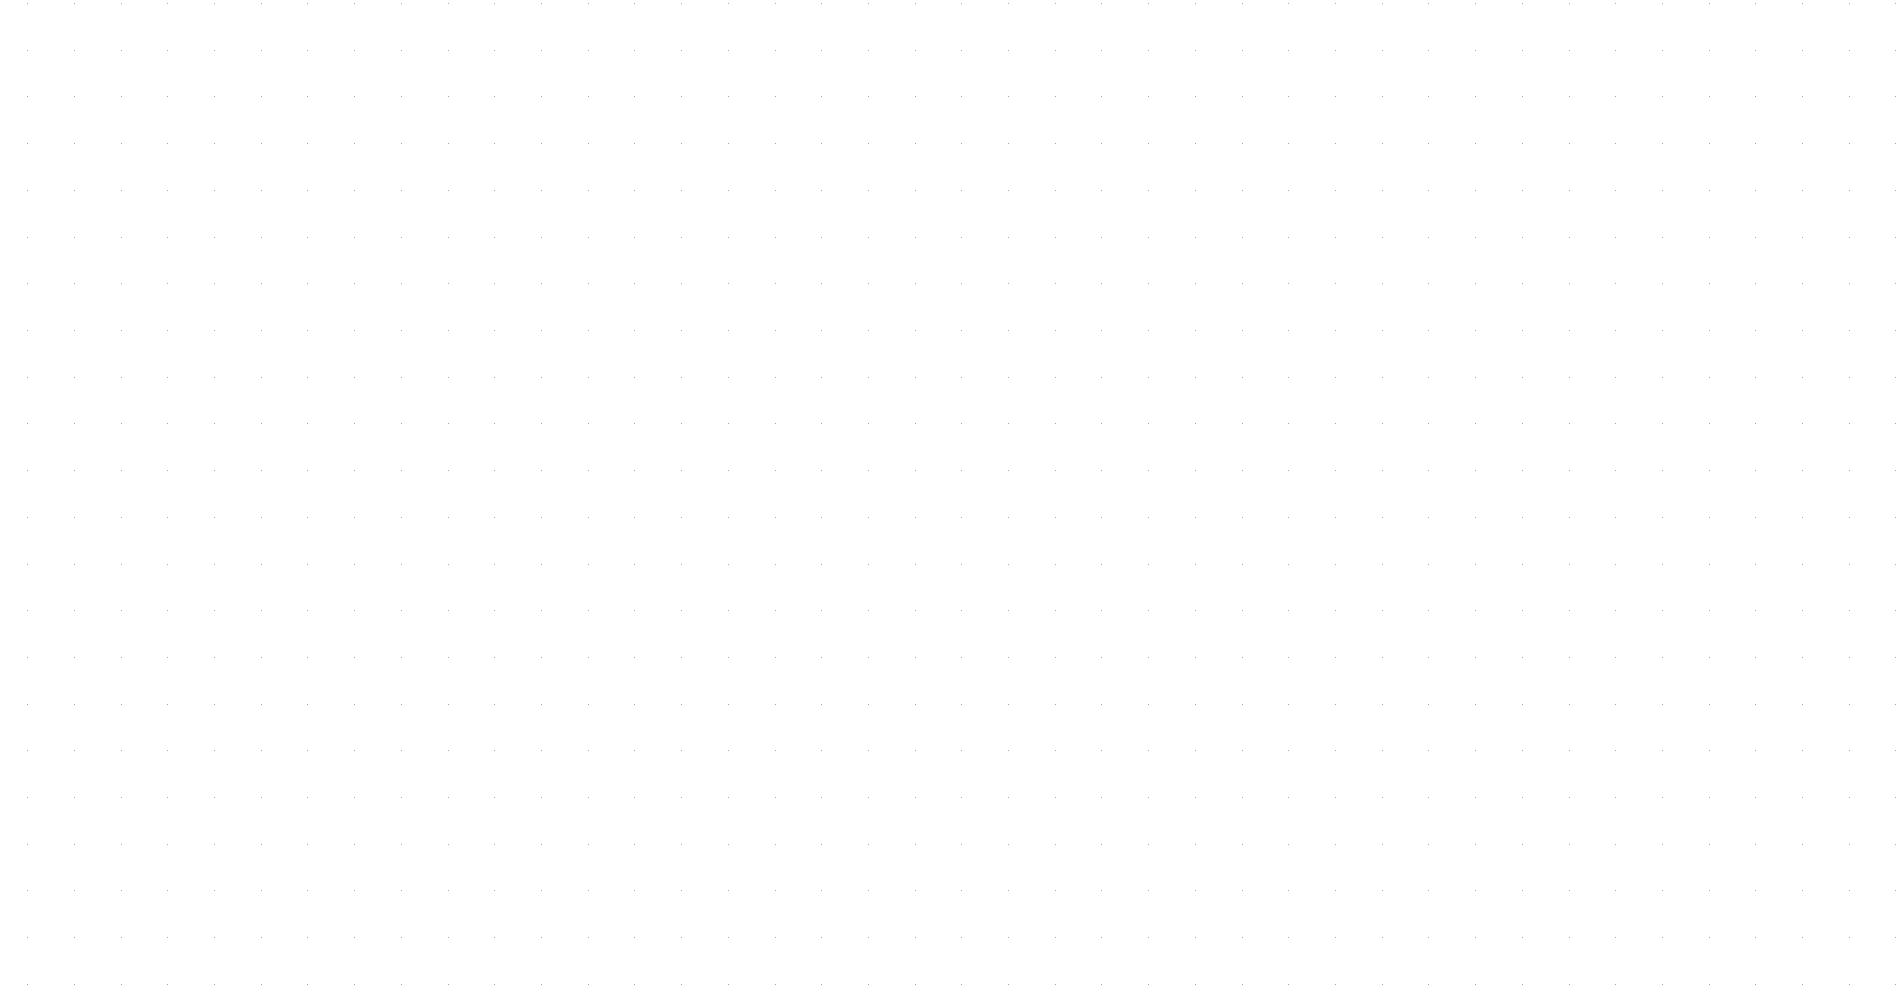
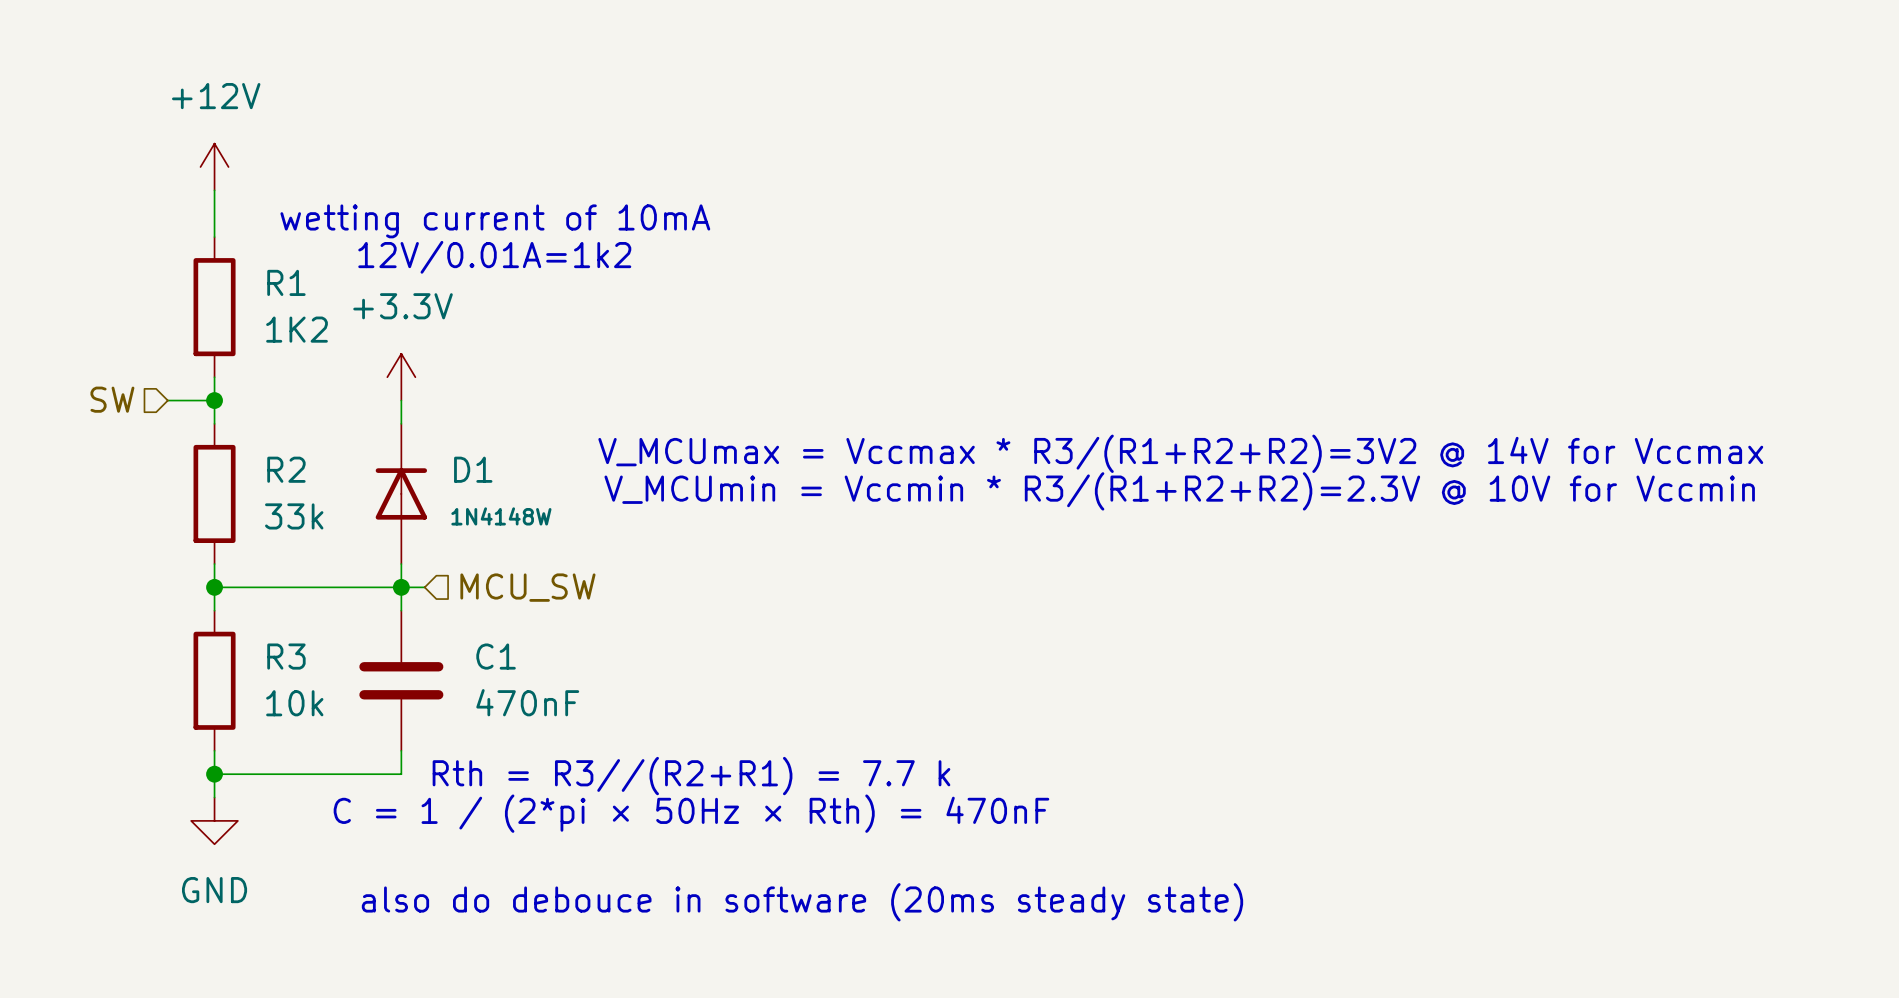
power symbol: none -> +12V (214, 167)
wire: none -> (214, 190) (214, 237)
text: none -> wetting current of 10mA (495, 221)
text: none -> 12V/0.01A=1k2 (494, 257)
R1: none -> 1K2 (214, 307)
wire: none -> (214, 377) (214, 423)
power symbol: none -> +3.3V (401, 377)
hierarchical label: none -> SW (112, 399)
wire: none -> (167, 400) (214, 400)
junction: none -> (214, 400)
wire: none -> (401, 400) (401, 423)
text: none -> V_MCUmax = Vccmax * R3/(R1+R2+R2)=3V2 @ 14V for Vccmax (1180, 453)
text: none -> V_MCUmin = Vccmin * R3/(R1+R2+R2)=2.3V @ 10V for Vccmin (1179, 491)
R2: none -> 33k (214, 493)
D1: none -> 1N4148W (401, 493)
wire: none -> (214, 564) (214, 610)
wire: none -> (401, 564) (401, 610)
wire: none -> (214, 587) (424, 587)
junction: none -> (214, 587)
junction: none -> (401, 587)
hierarchical label: none -> MCU_SW (527, 587)
R3: none -> 10k (214, 680)
C1: none -> 470nF (401, 680)
wire: none -> (214, 750) (214, 797)
wire: none -> (401, 750) (401, 774) (214, 774)
junction: none -> (214, 774)
text: none -> Rth = R3//(R2+R1) = 7.7 k (691, 776)
text: none -> C = 1 / (2*pi × 50Hz × Rth) = 470nF (691, 813)
power symbol: none -> GND (214, 820)
text: none -> also do debouce in software (20ms steady state) (802, 902)

